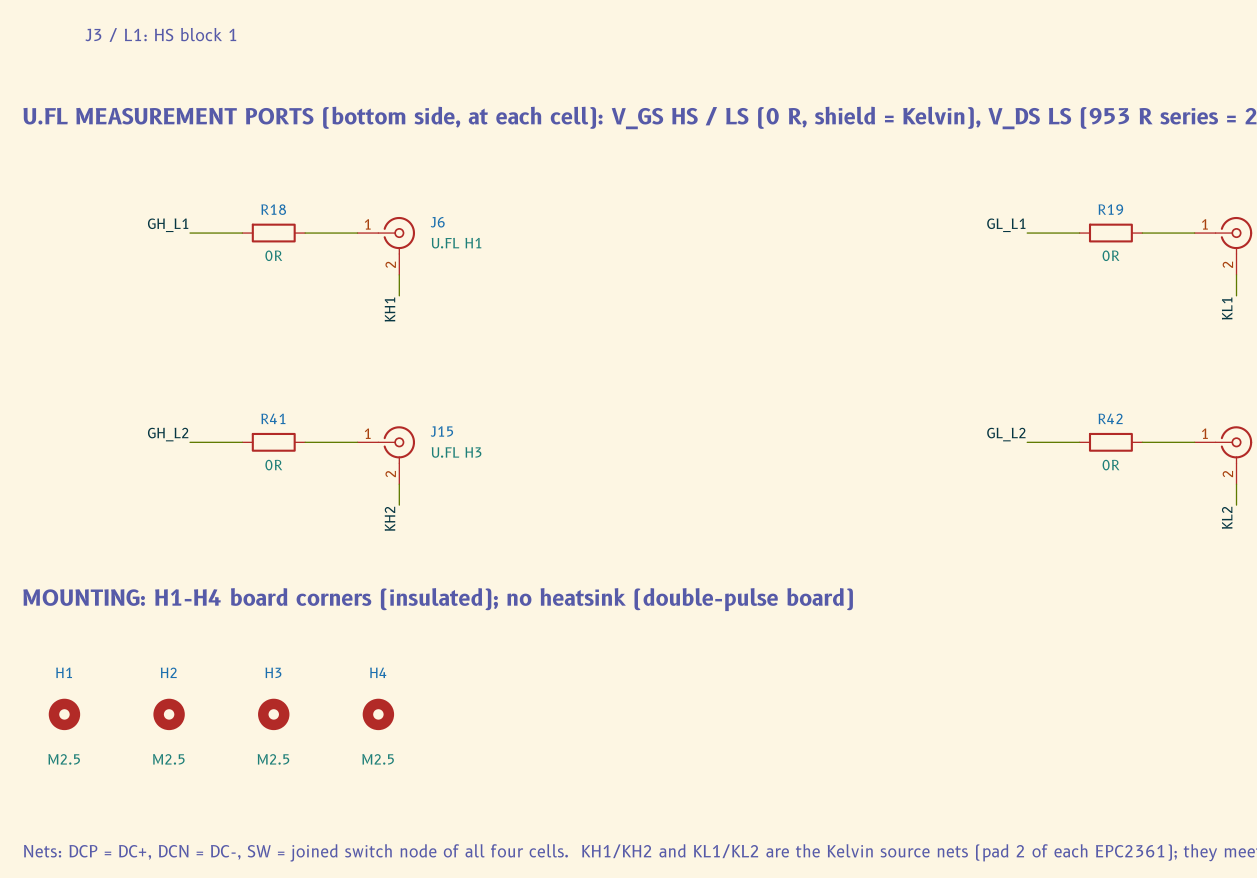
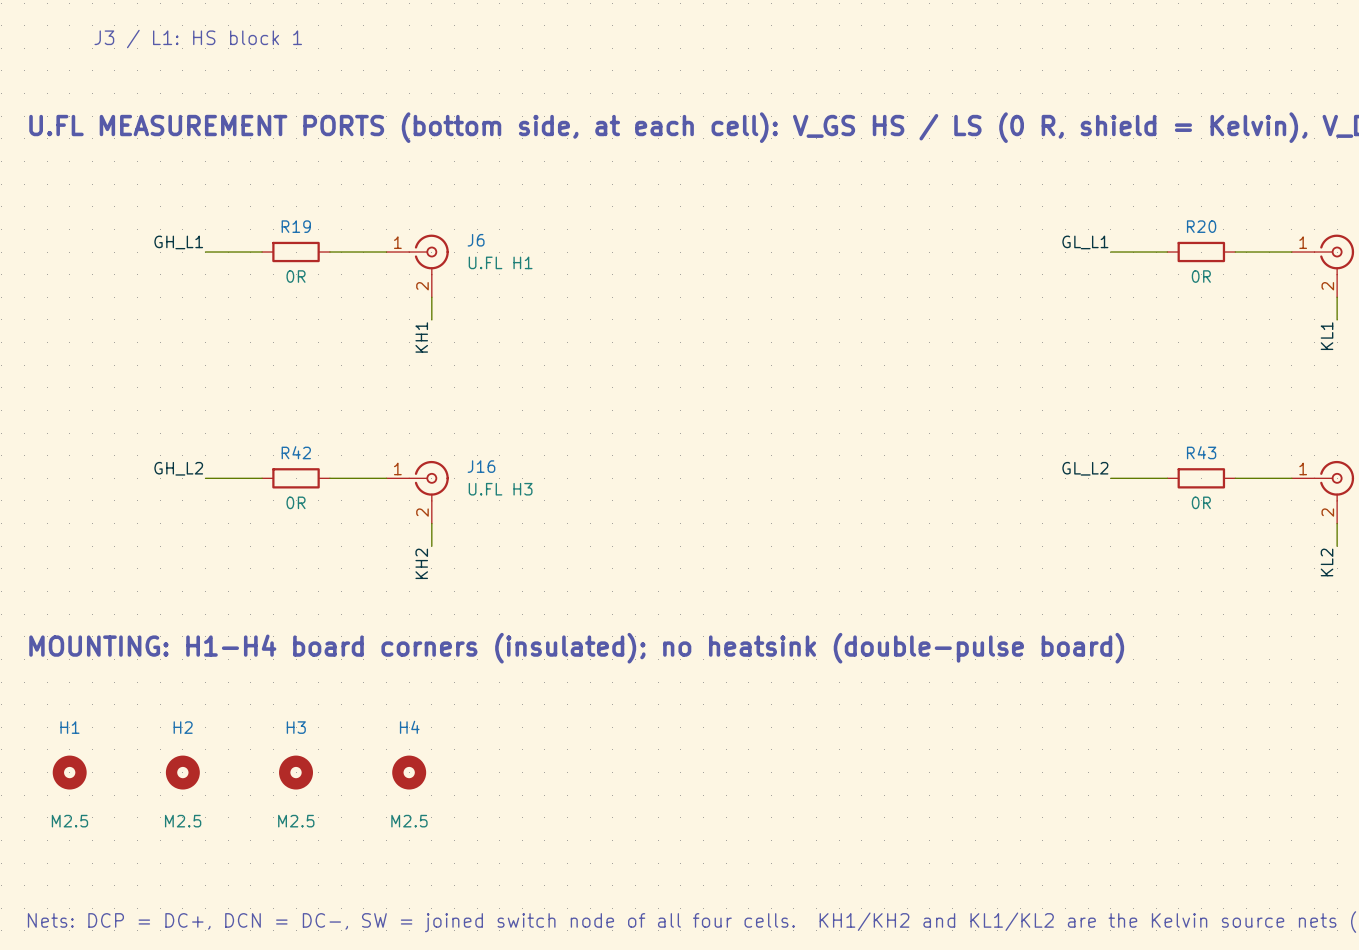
R18 name: R18 (273, 209) -> R19 (296, 226)
R19 name: R19 (1110, 209) -> R20 (1201, 226)
R41 name: R41 (273, 418) -> R42 (296, 452)
R42 name: R42 (1110, 418) -> R43 (1201, 452)
J15 name: J15 (441, 431) -> J16 (481, 466)

